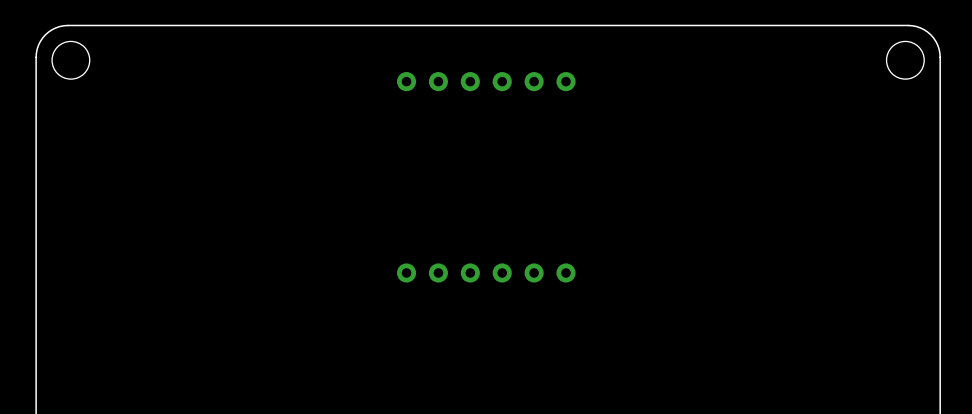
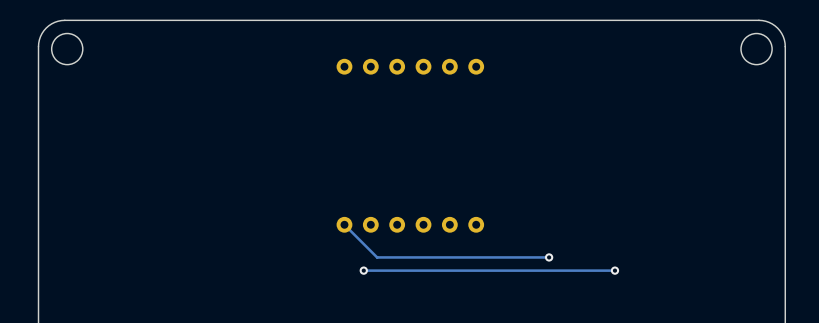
track: none -> (344, 224) (377, 257) (549, 257)
via: none -> (549, 257)
via: none -> (363, 270)
track: none -> (614, 270) (363, 270)
via: none -> (614, 270)

